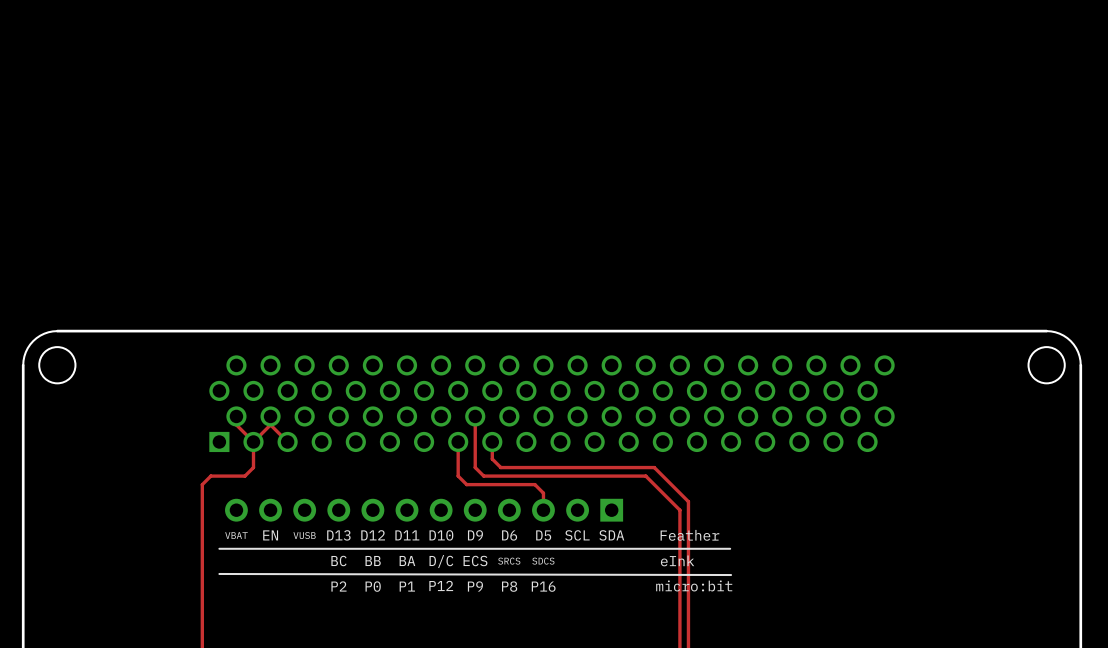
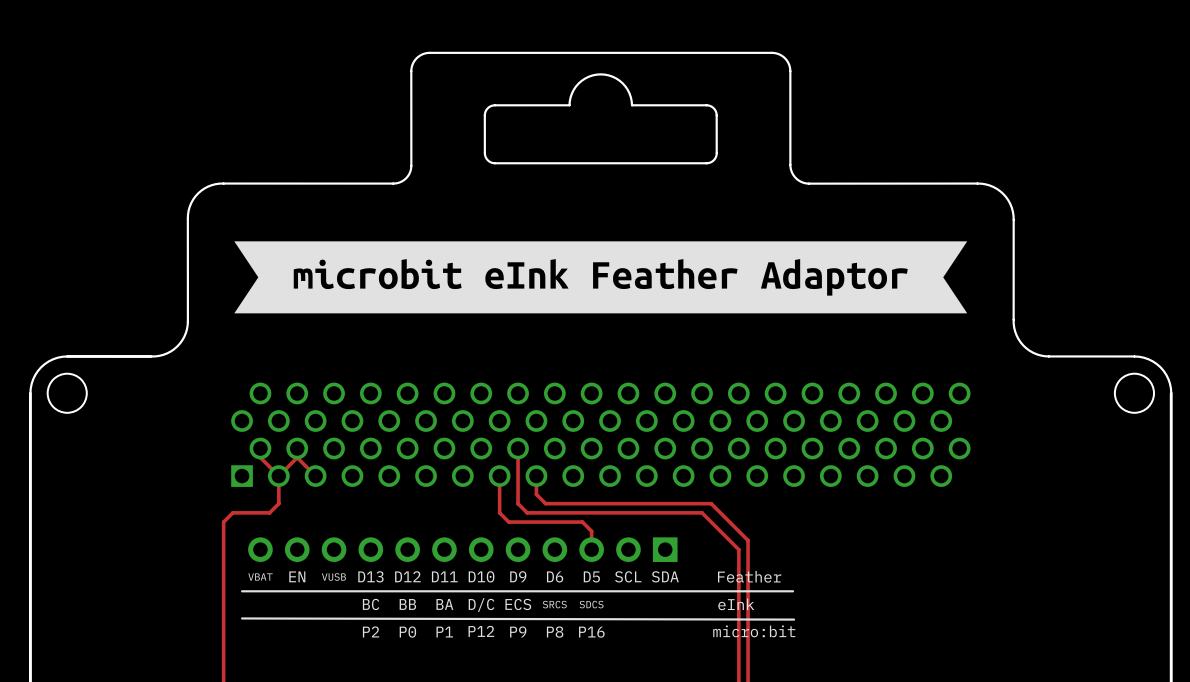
board edge: none -> (494, 105) (569, 105) (571, 93) (581, 80) (592, 75) (608, 75) (619, 80) (625, 86) (629, 93) (632, 105) (706, 105) (712, 107) (716, 114) (716, 155) (712, 161) (706, 163) (492, 163) (487, 160) (484, 154) (484, 115) (487, 108) (494, 105)
drawing: none -> [234, 241, 968, 314]
board edge: (57, 331) (1046, 331) -> (67, 356) (155, 356) (170, 351) (179, 343) (187, 325) (188, 210) (195, 196) (208, 186) (223, 183) (393, 183) (404, 179) (411, 167) (411, 67) (418, 56) (429, 52) (771, 52) (779, 54) (786, 59) (790, 69) (790, 166) (797, 179) (809, 183) (977, 183) (993, 186) (1005, 196) (1012, 211) (1013, 323) (1020, 342) (1029, 350) (1044, 356) (1134, 356)

